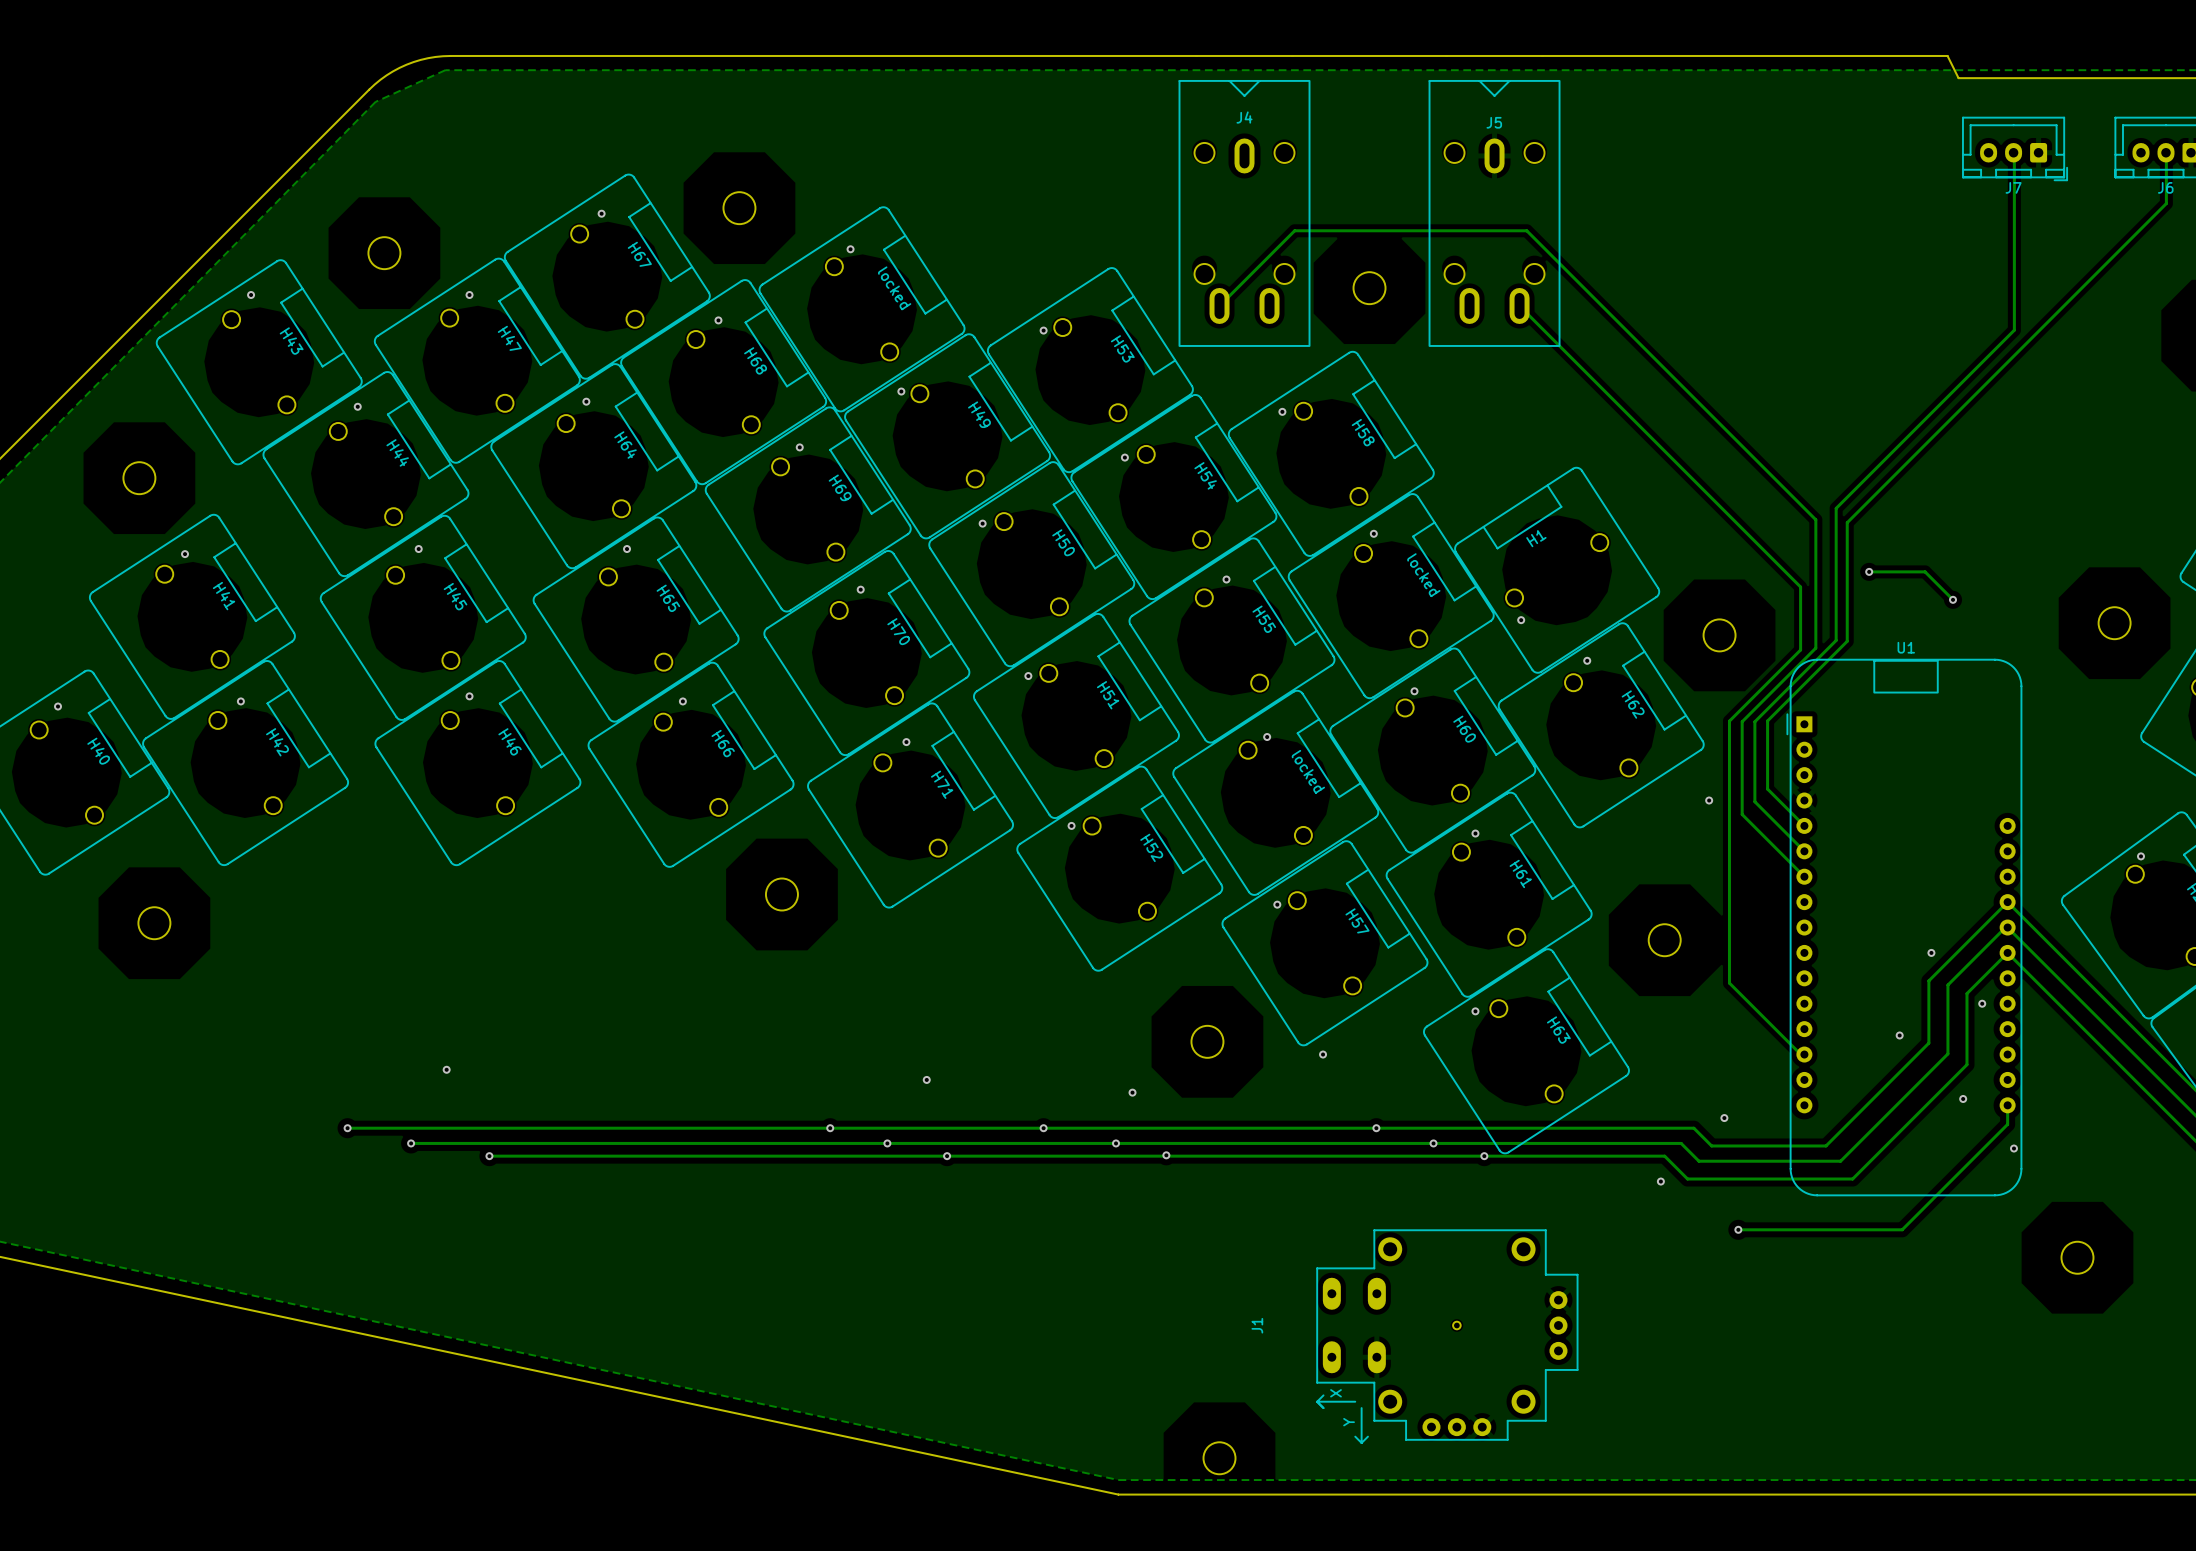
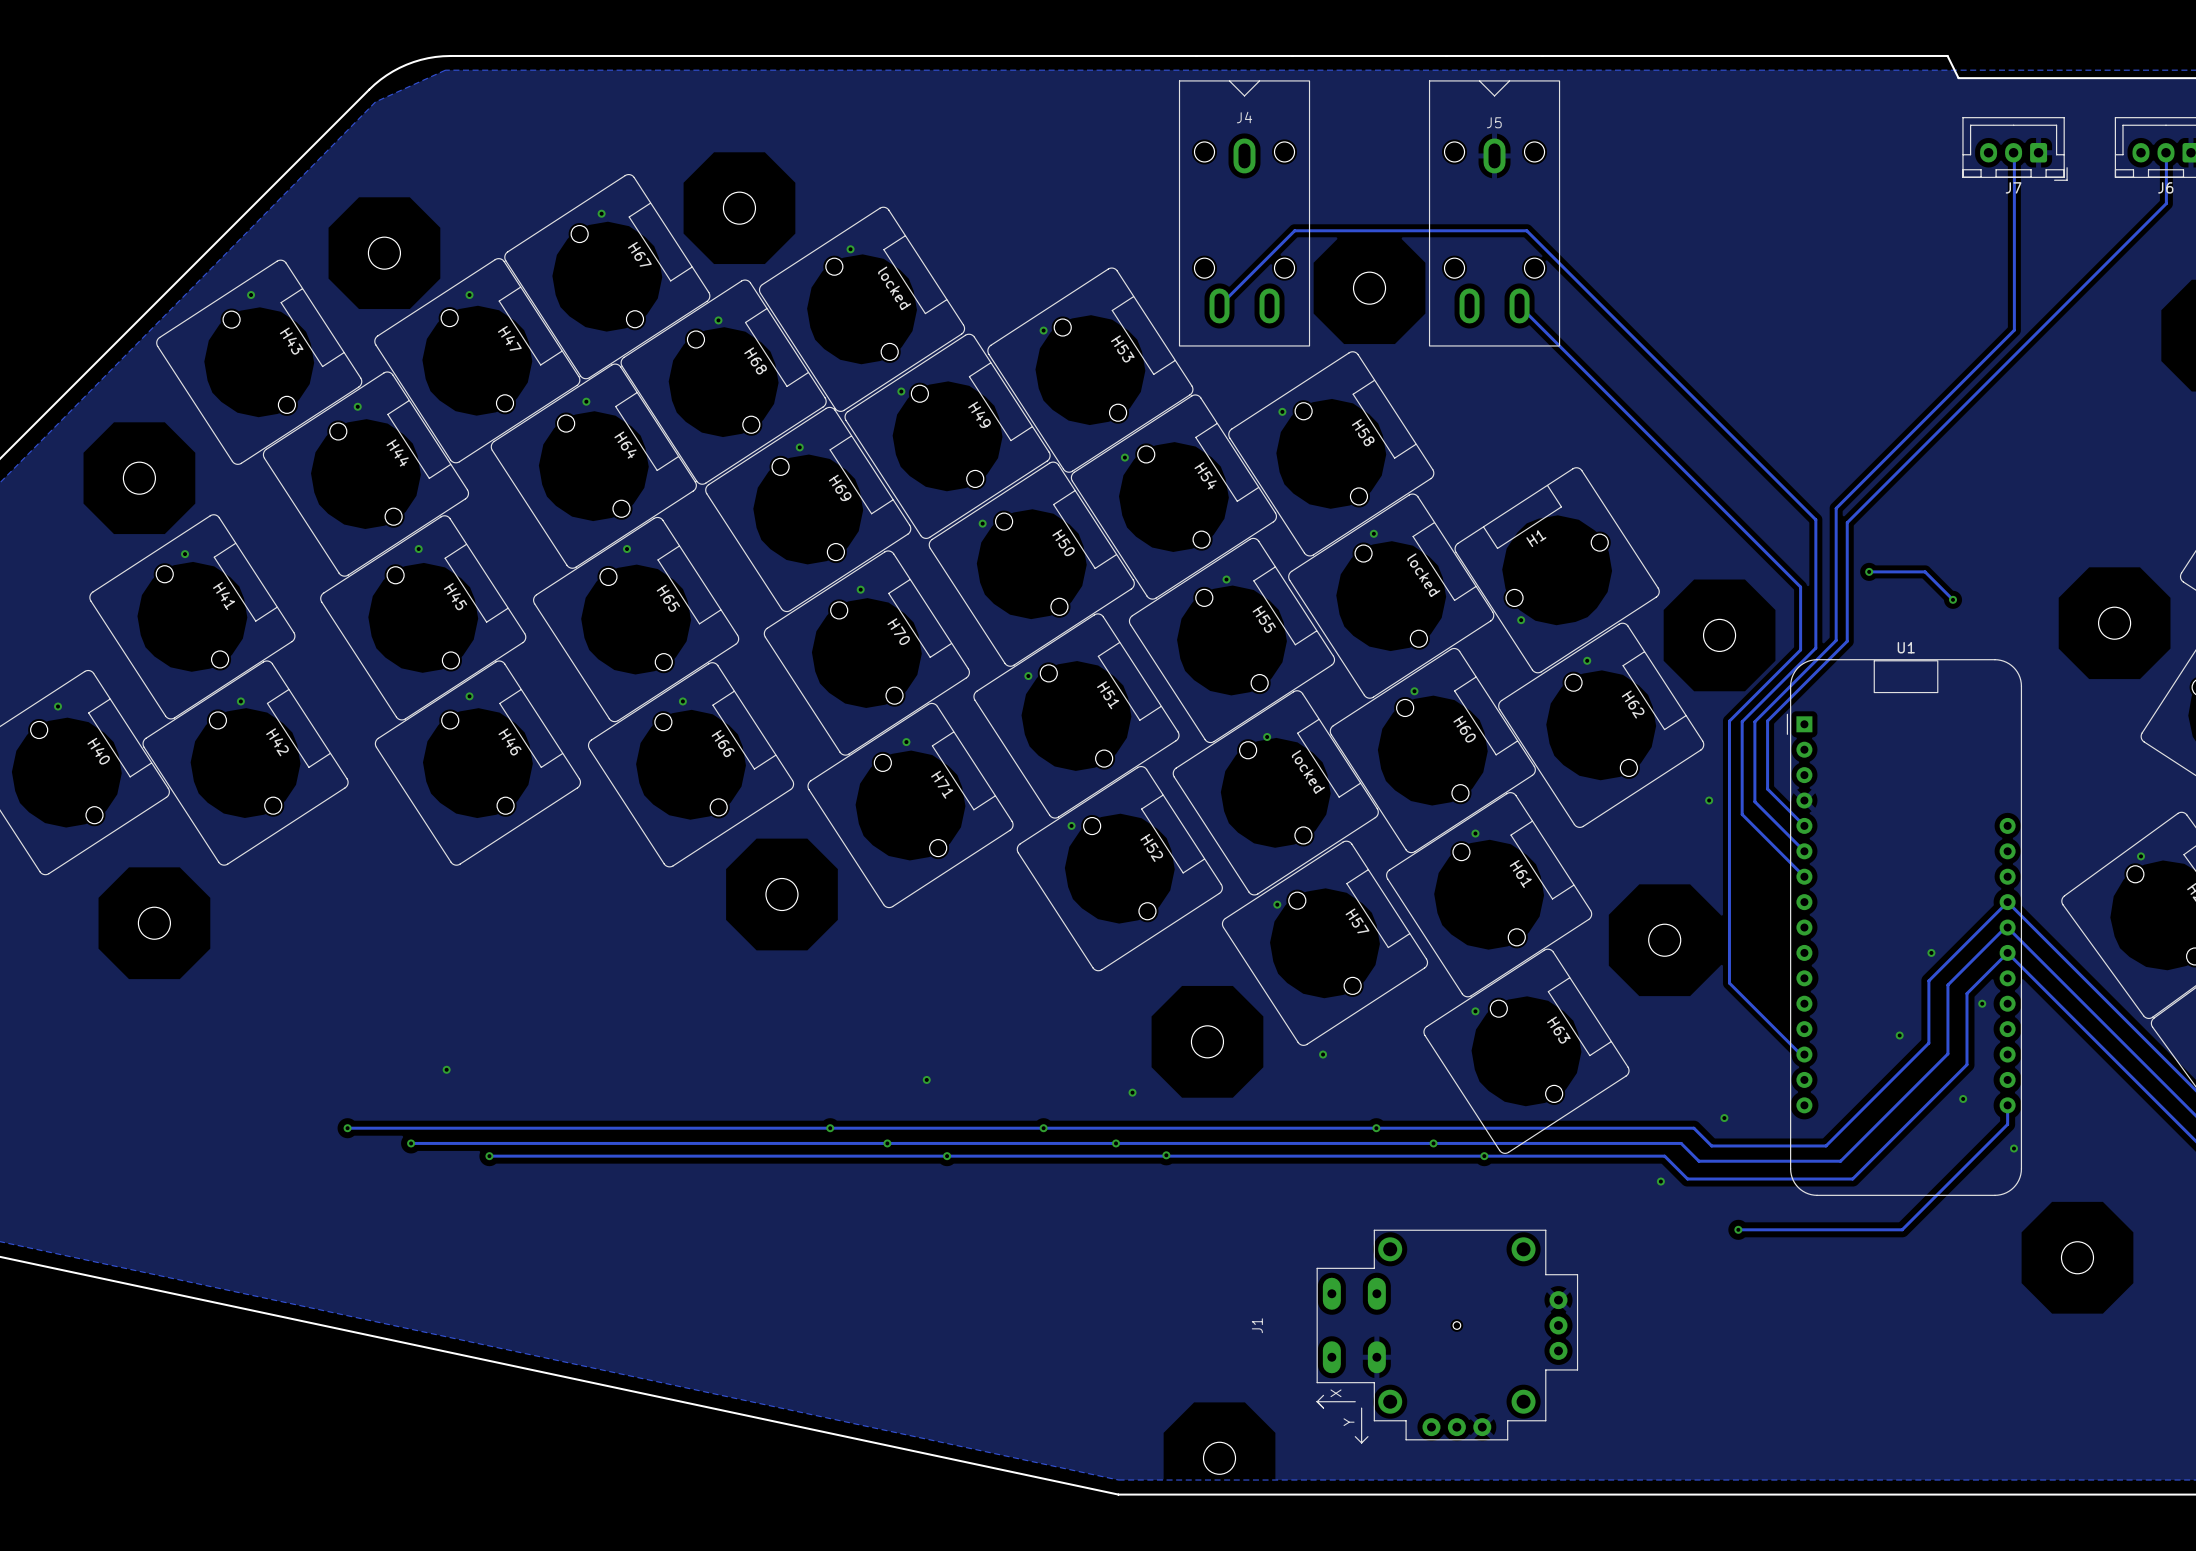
J4 footprint: [1179, 80, 1311, 347] -> [1179, 80, 1311, 347]
J5 footprint: [1429, 80, 1561, 347] -> [1429, 80, 1561, 347]

